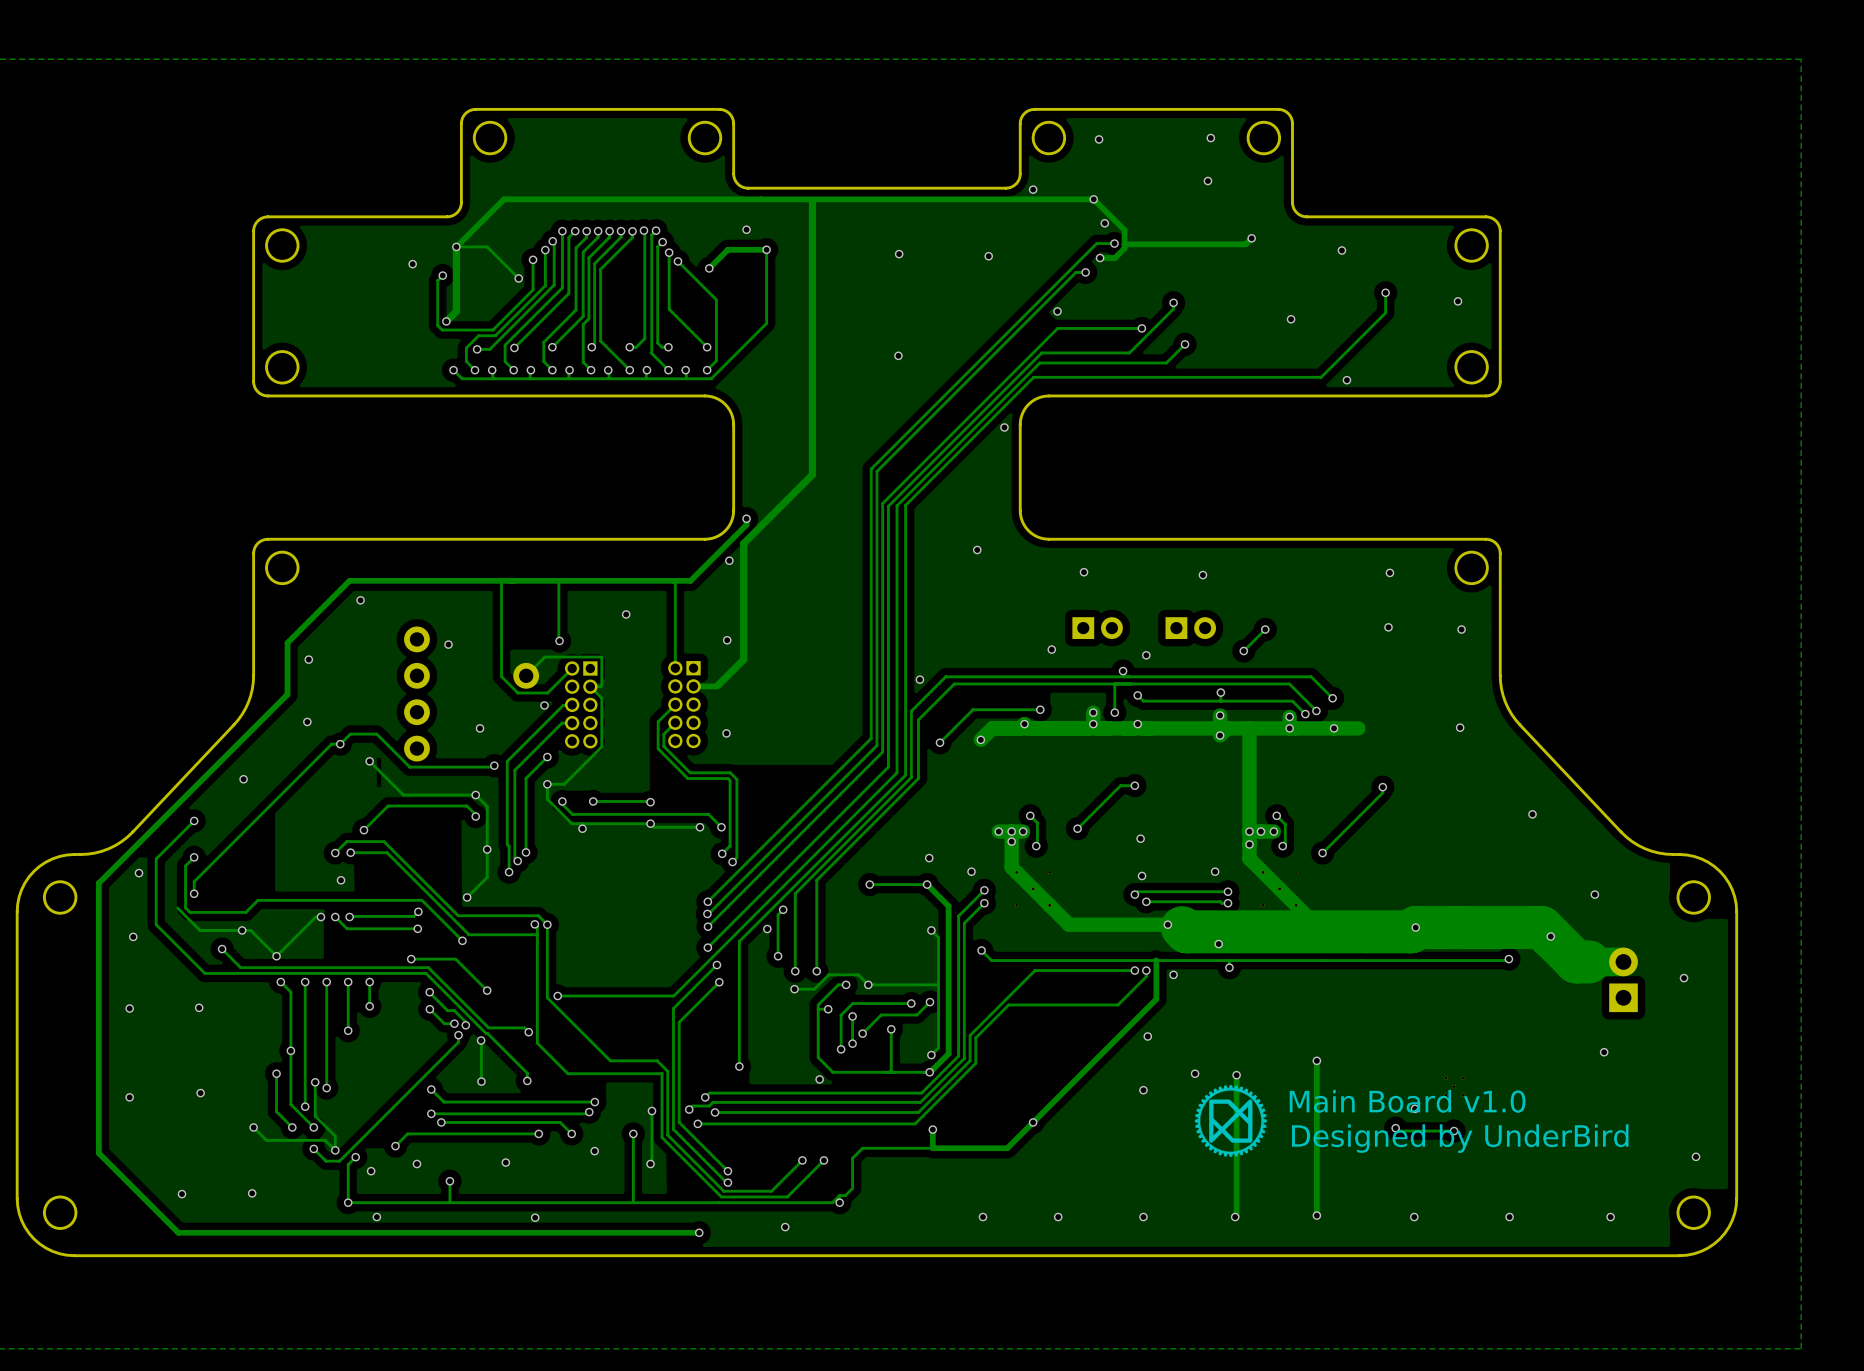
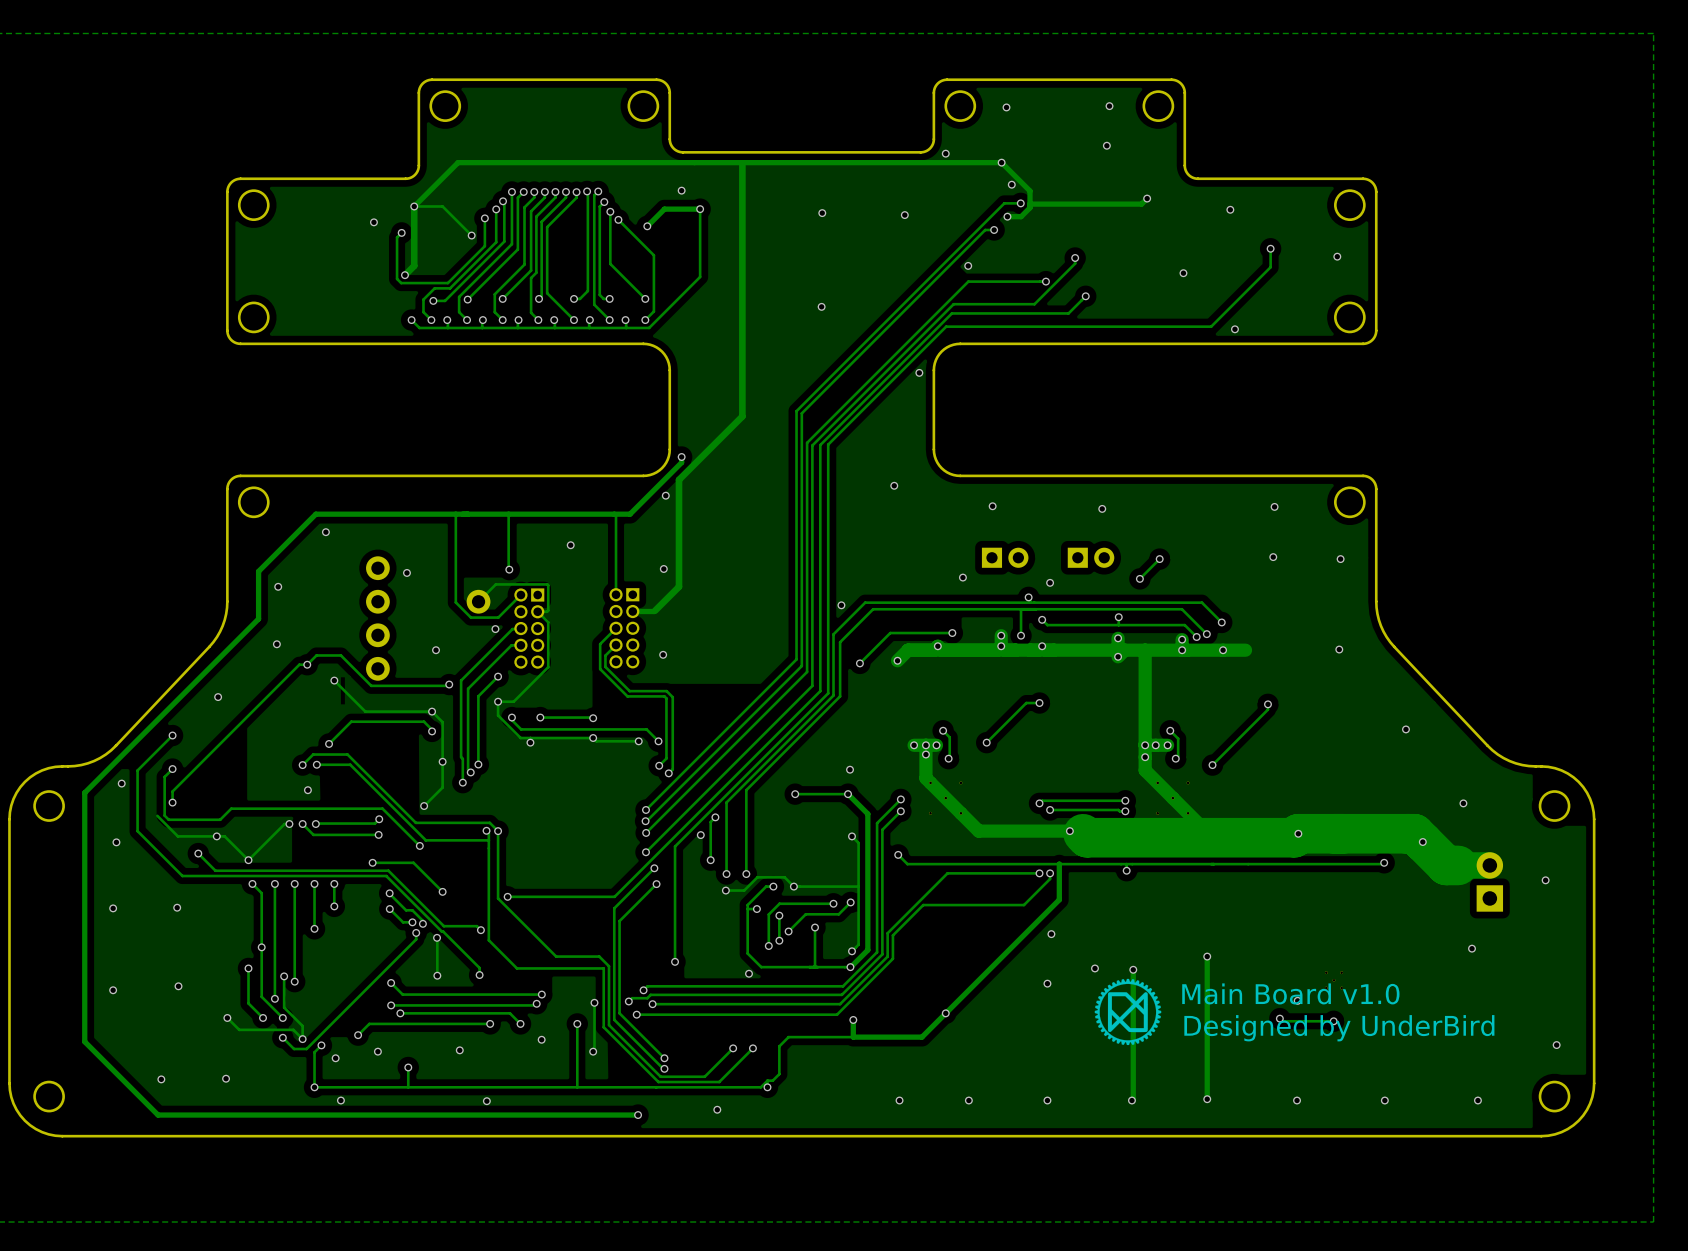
via: (1140, 838) -> none
via: (971, 871) -> none
via: (1215, 871) -> none
via: (1142, 875) -> none
via: (1218, 944) -> none
via: (1173, 974) -> none

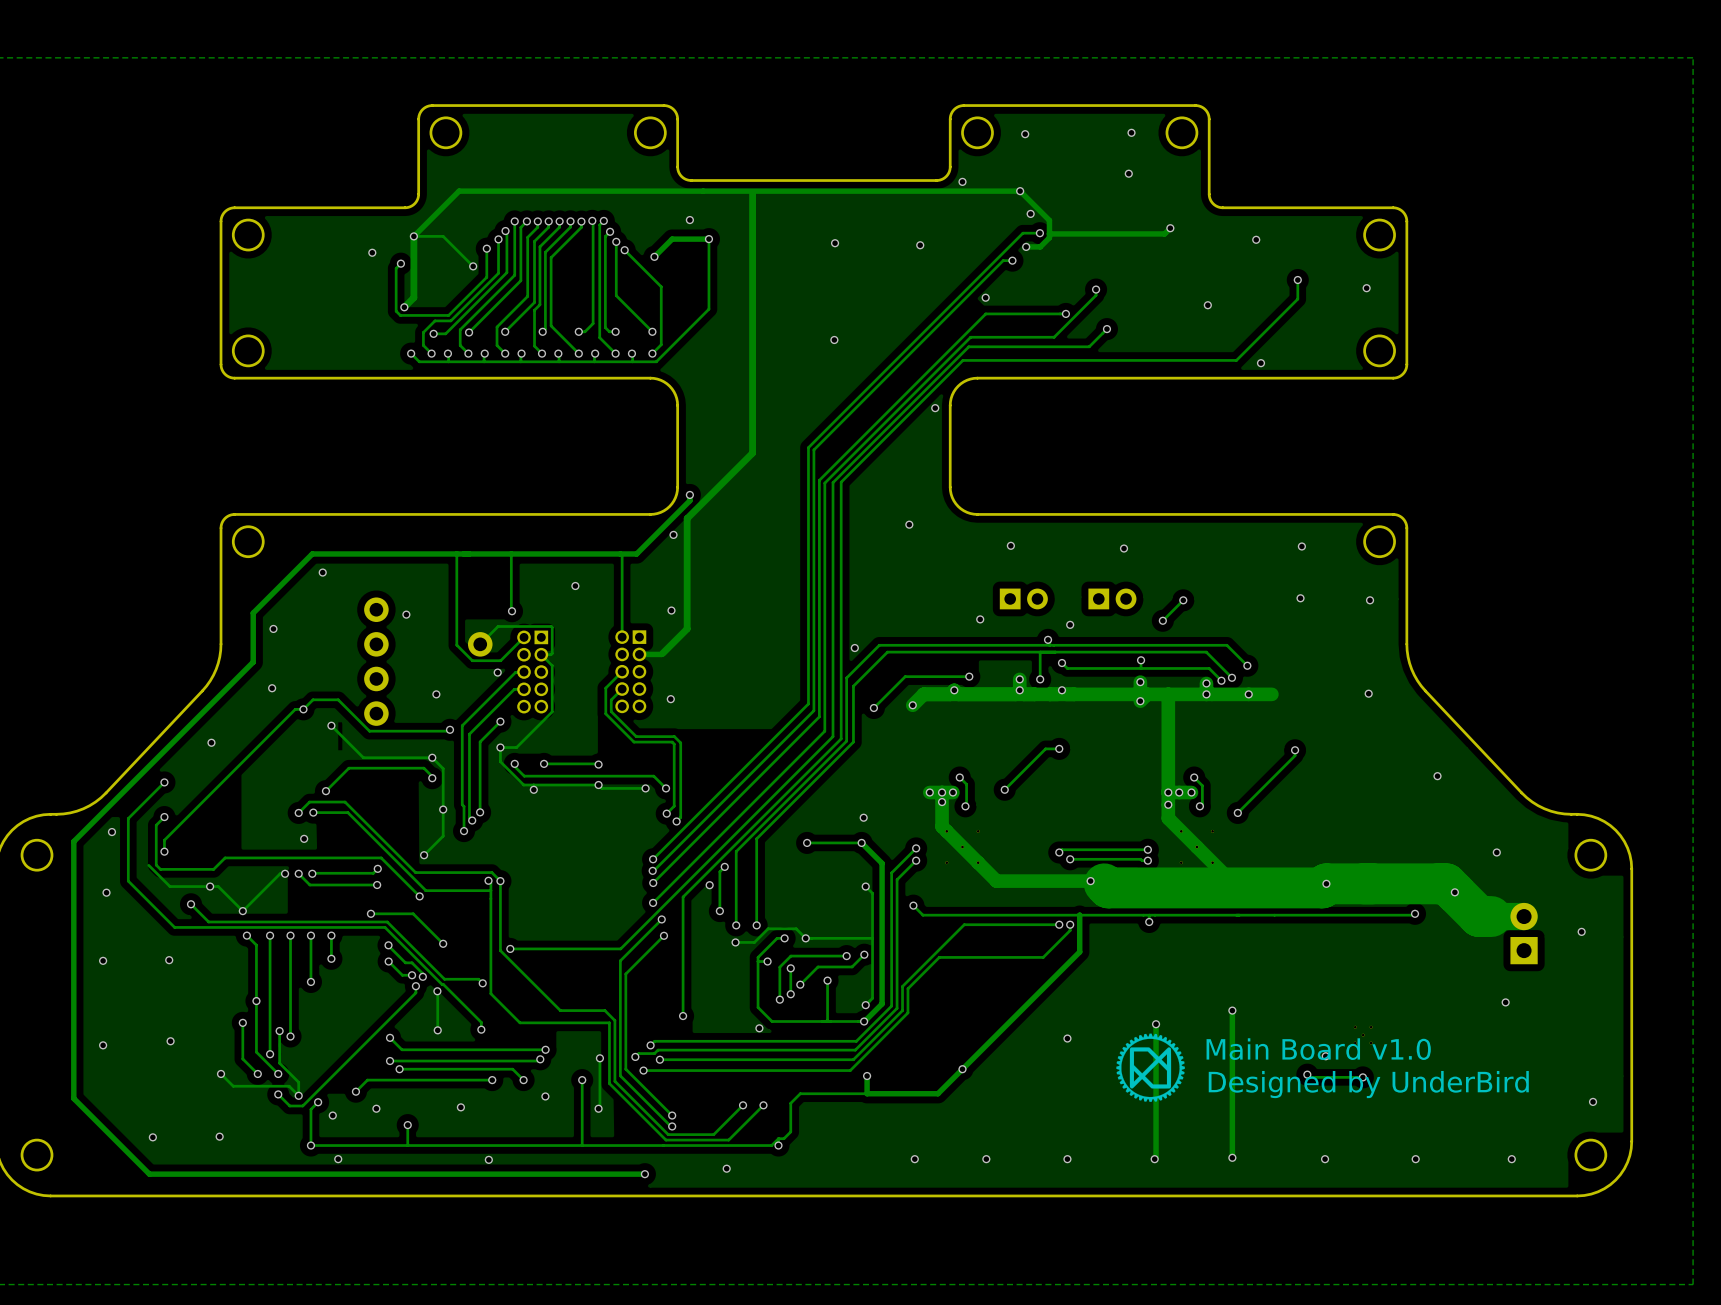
via: (1051, 934) -> none
via: (1094, 968) -> none

